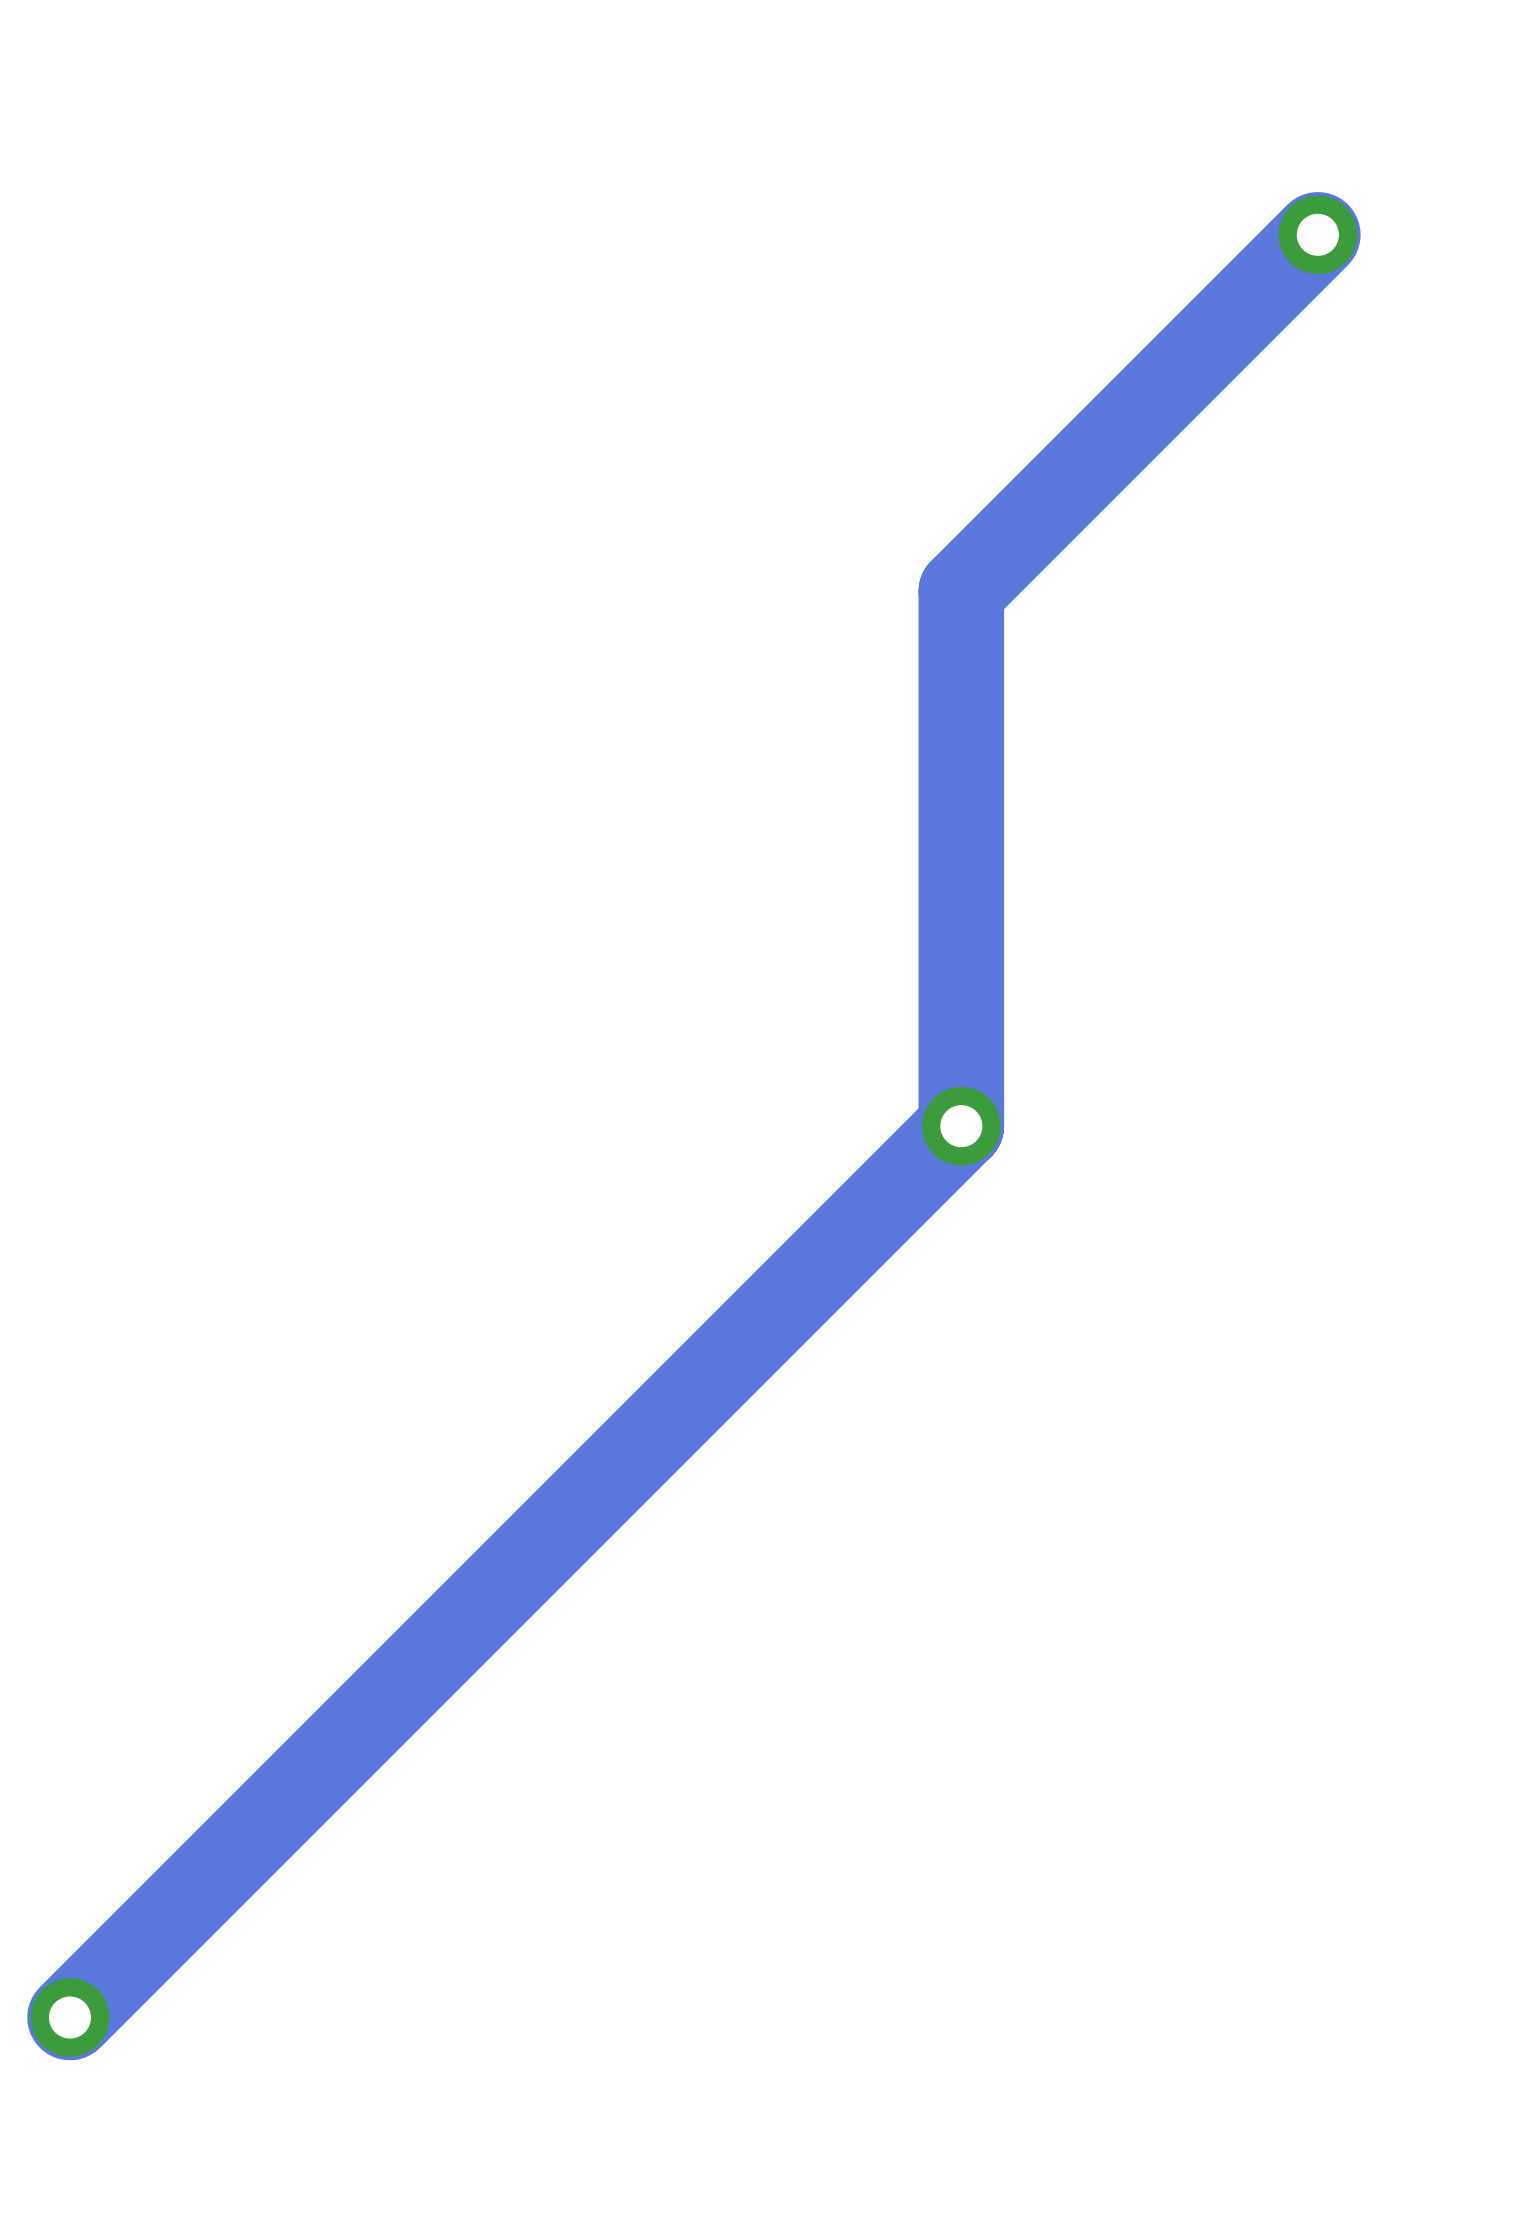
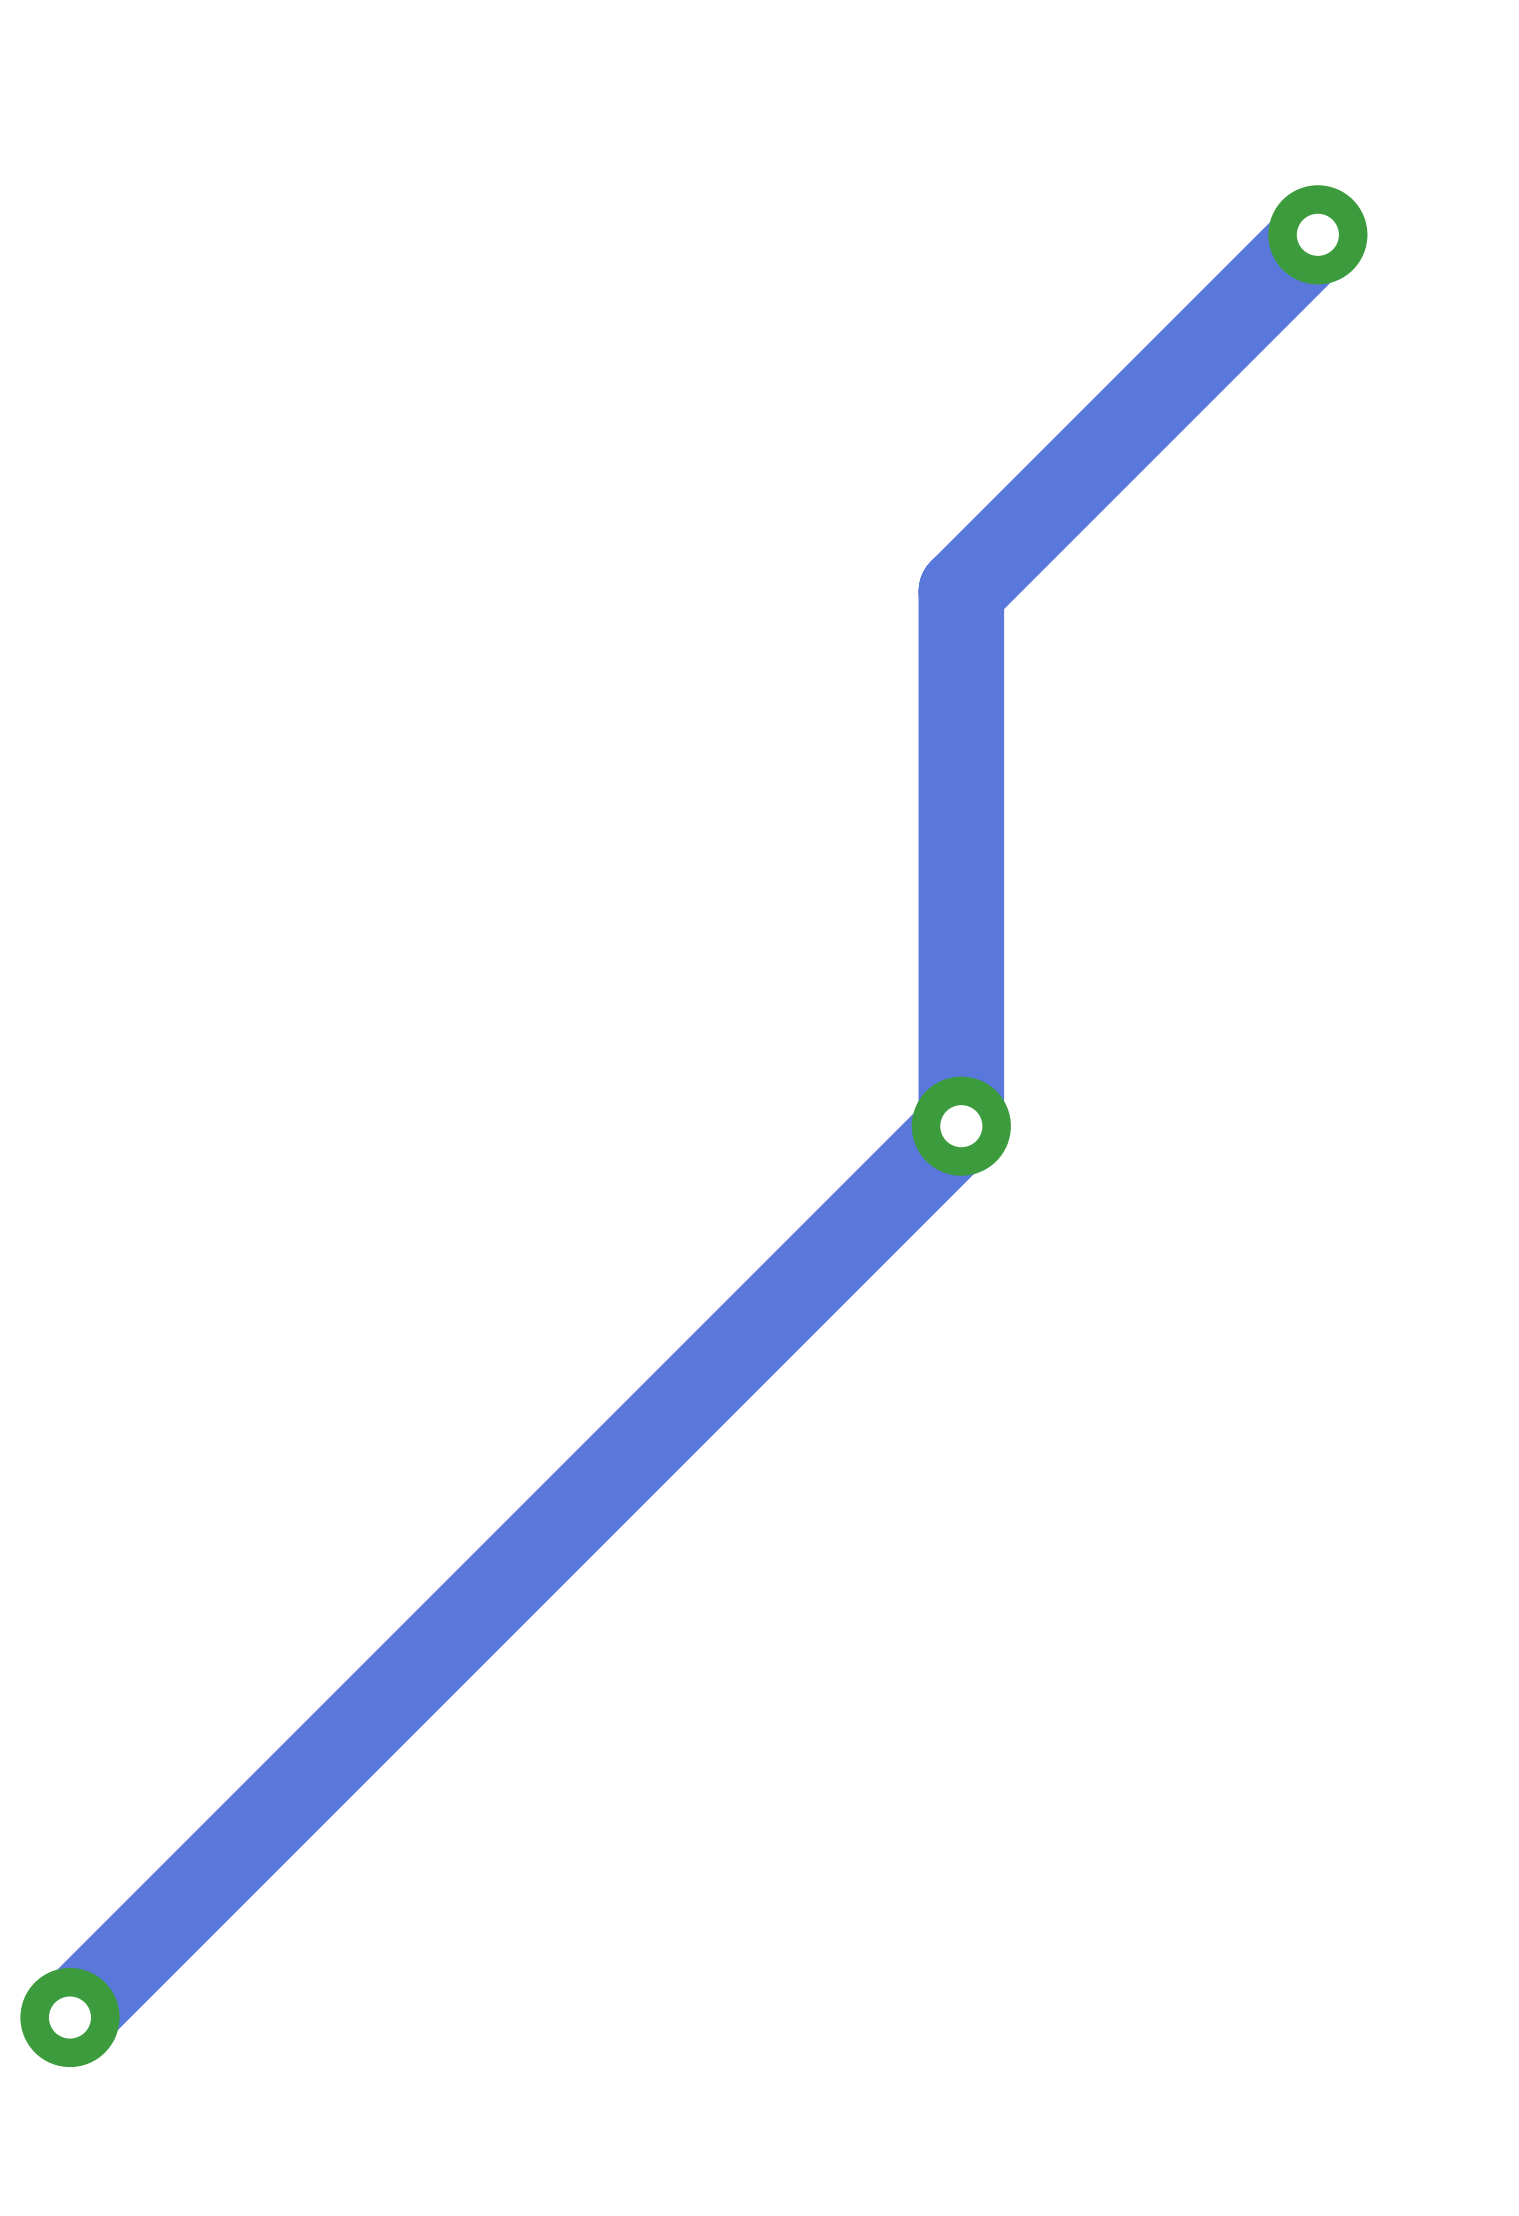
via size: [1278, 195, 1358, 275] -> [1268, 185, 1368, 285]
via size: [922, 1086, 1001, 1166] -> [911, 1076, 1011, 1176]
via size: [30, 1978, 110, 2057] -> [20, 1967, 120, 2068]

